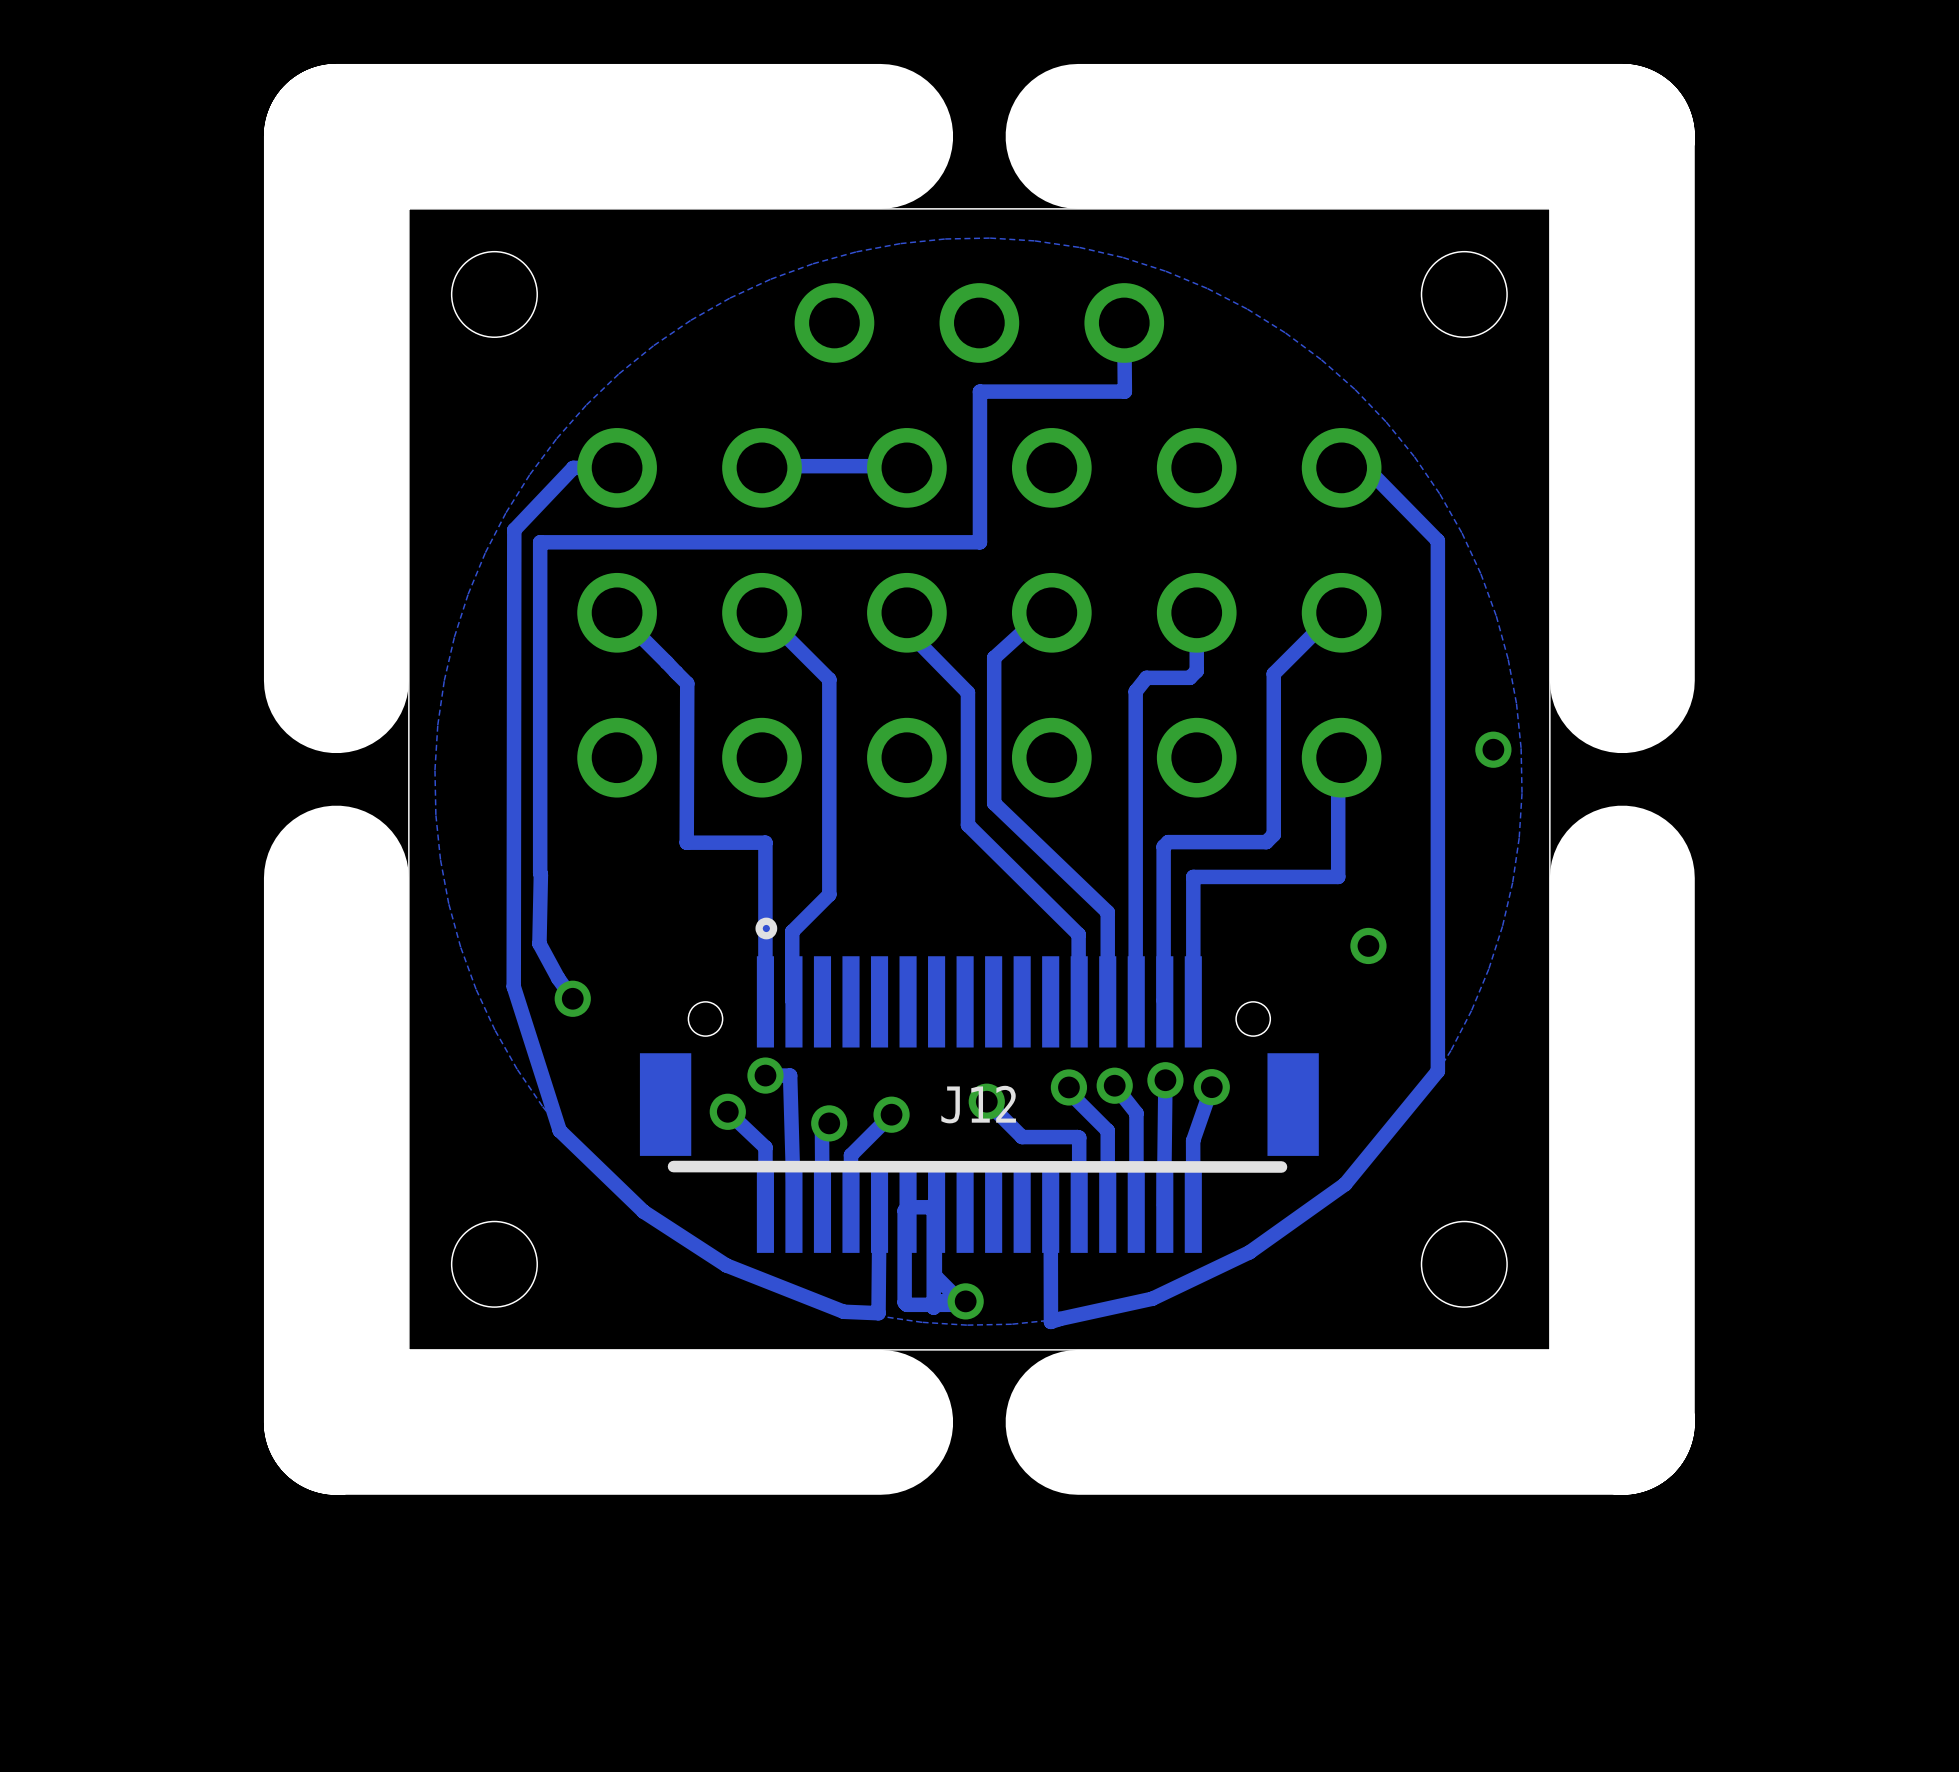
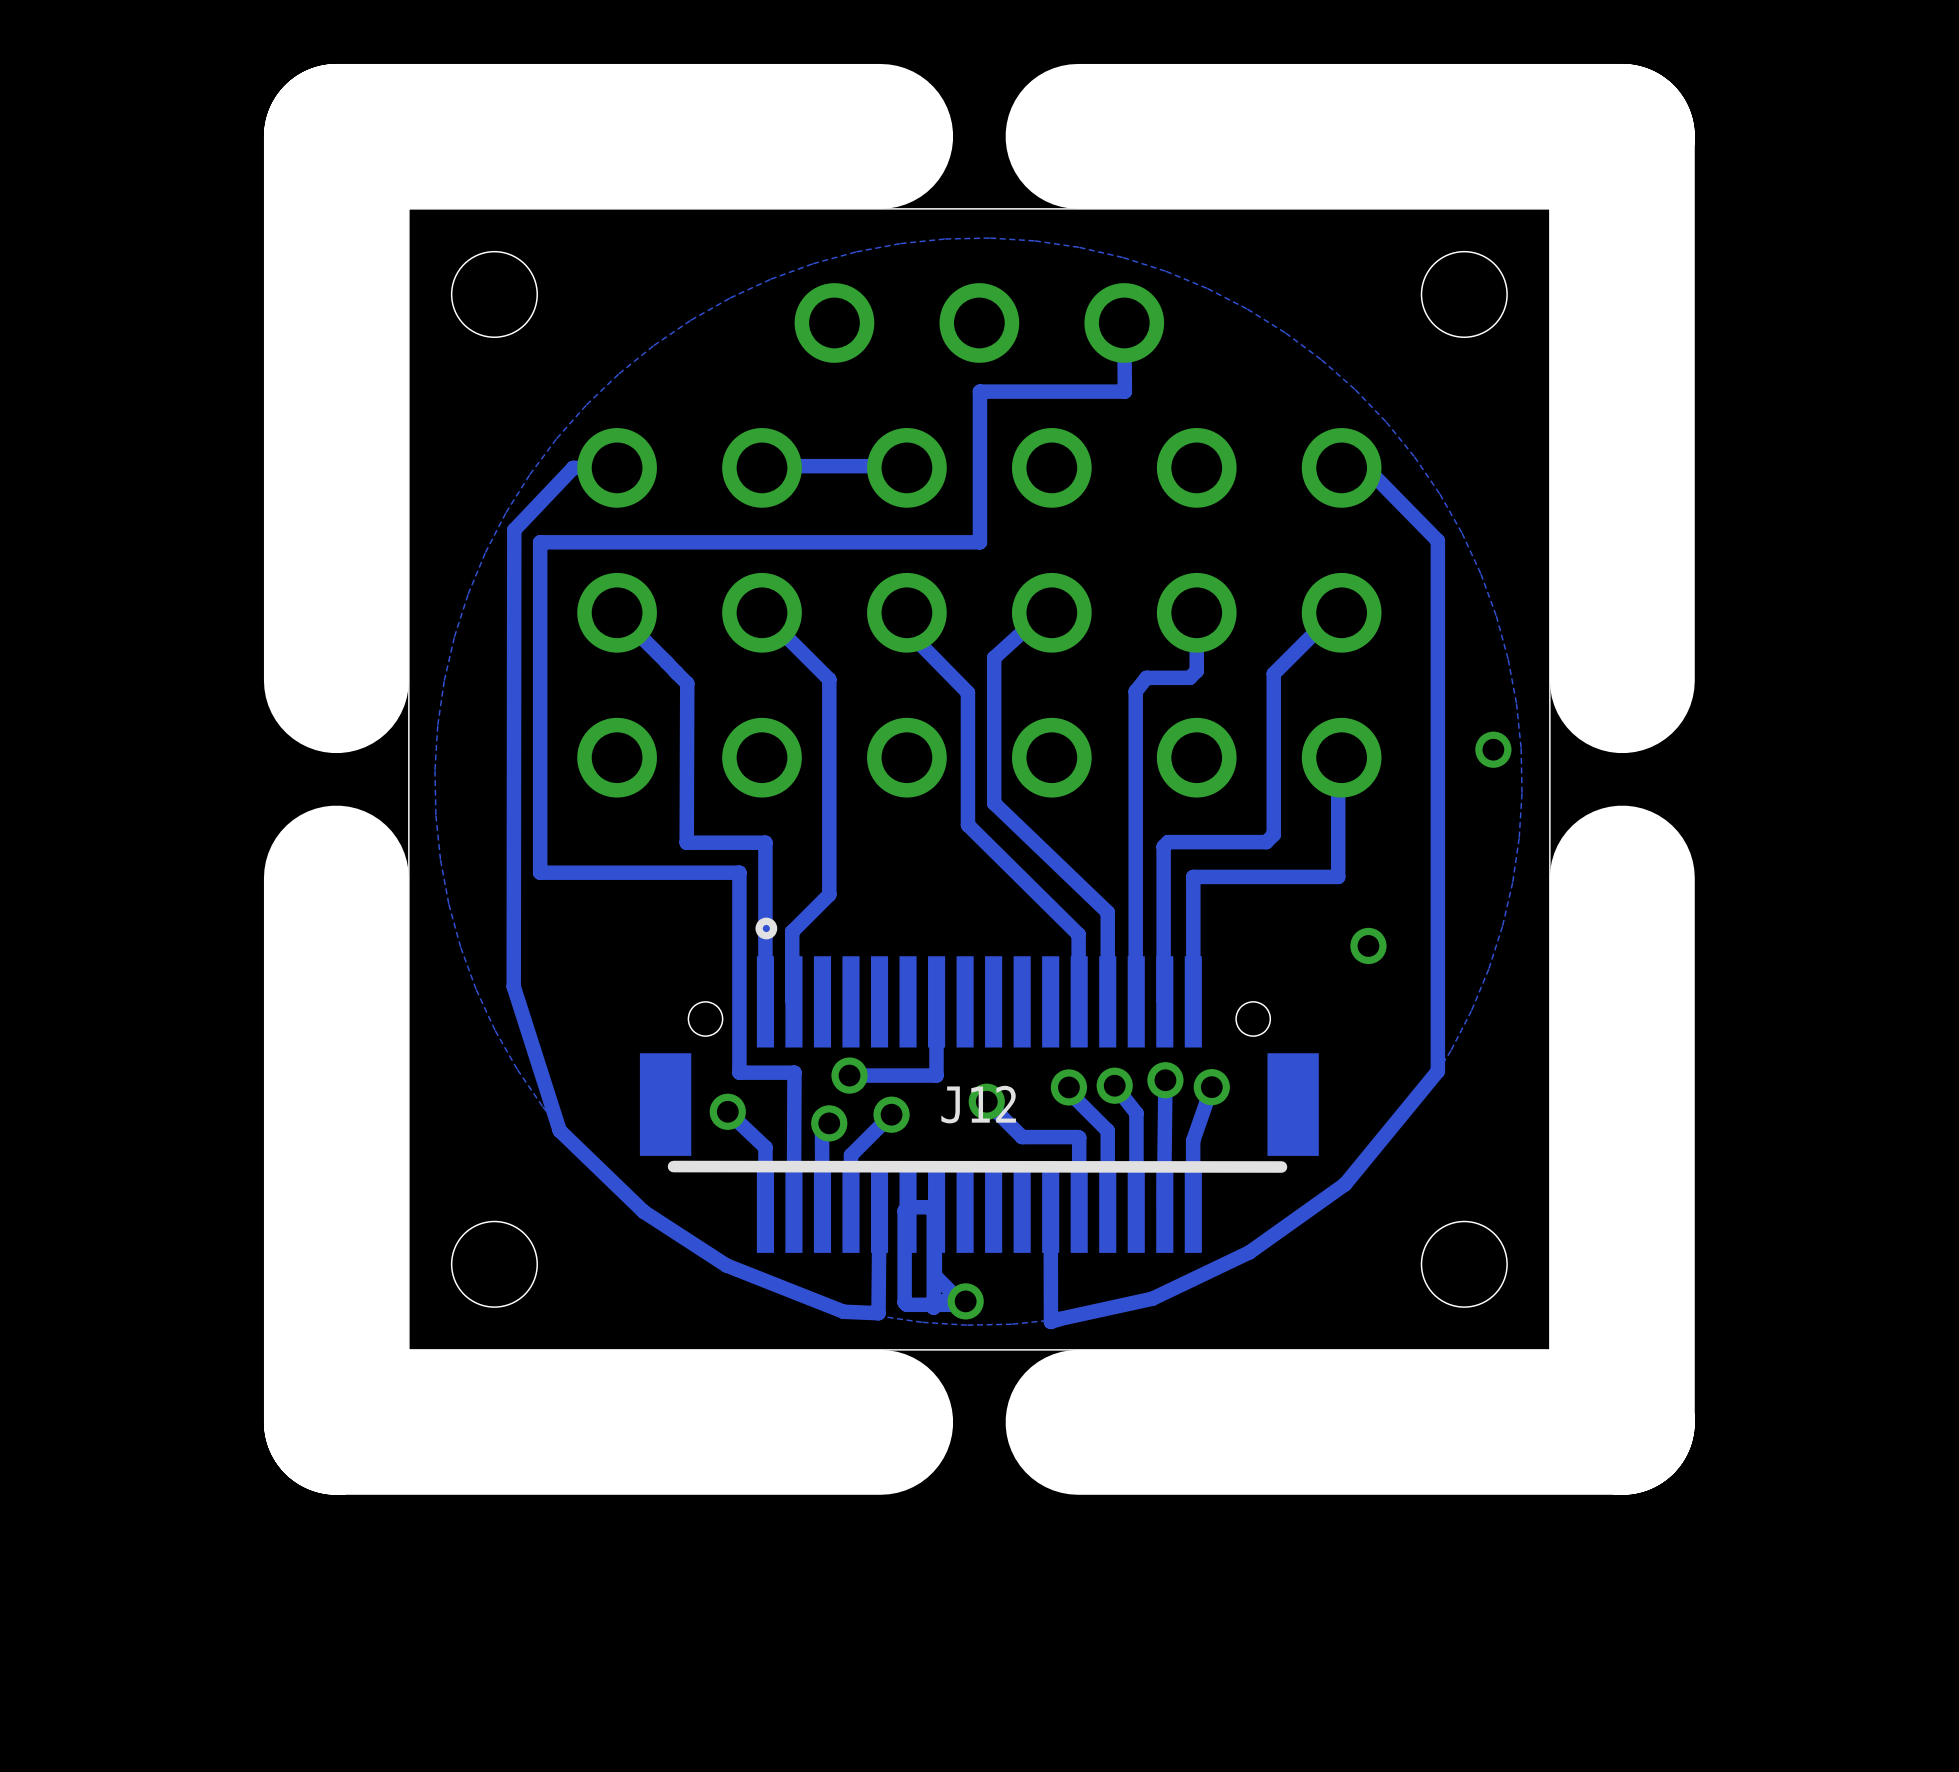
track: (540, 872) (539, 943) (558, 978) (572, 998) -> none
via: (572, 998) -> none
track: none -> (936, 1001) (936, 1075) (849, 1075)
track: (765, 1075) (790, 1075) (793, 1207) -> (540, 872) (739, 872) (739, 1072) (794, 1072) (793, 1207)
via position: (765, 1075) -> (849, 1075)

